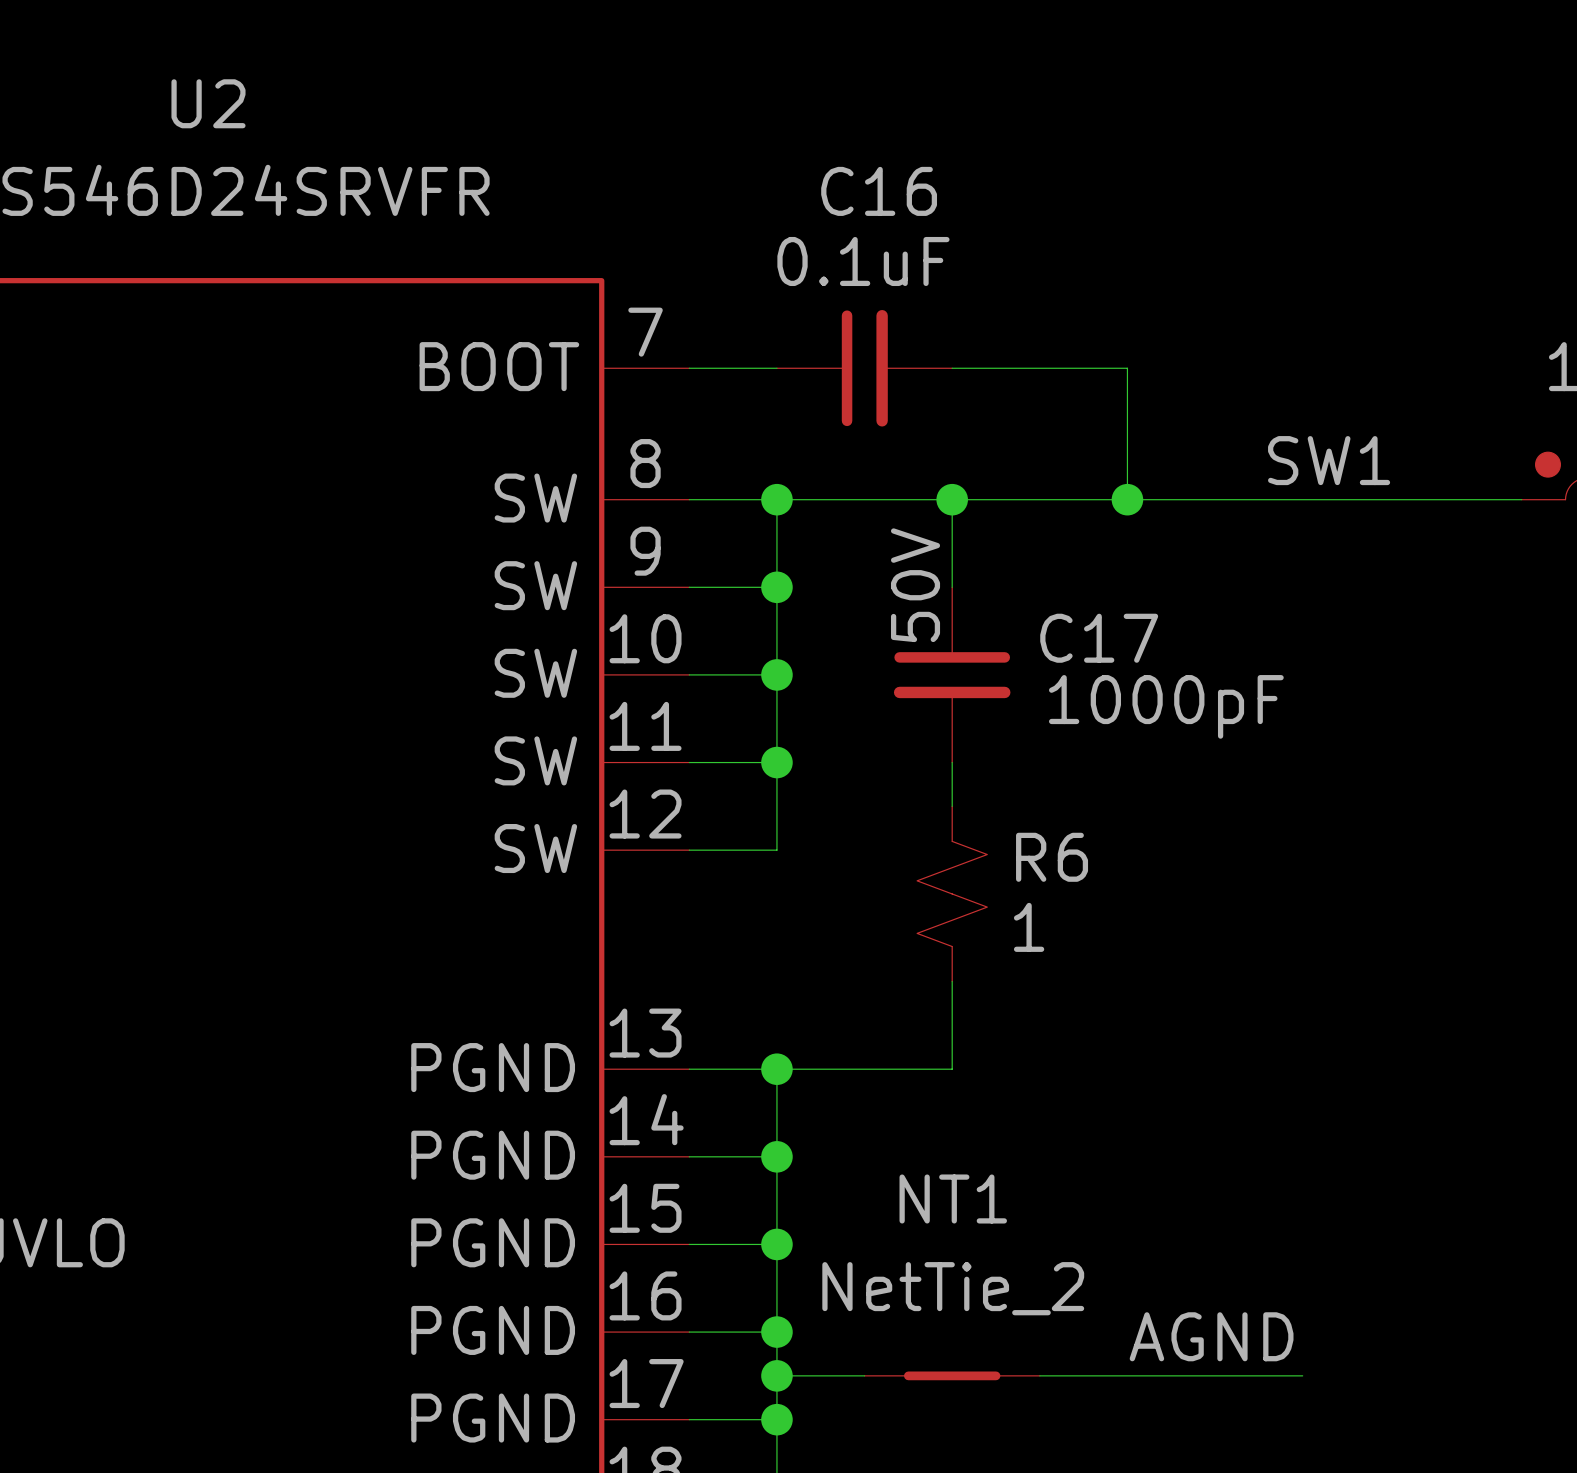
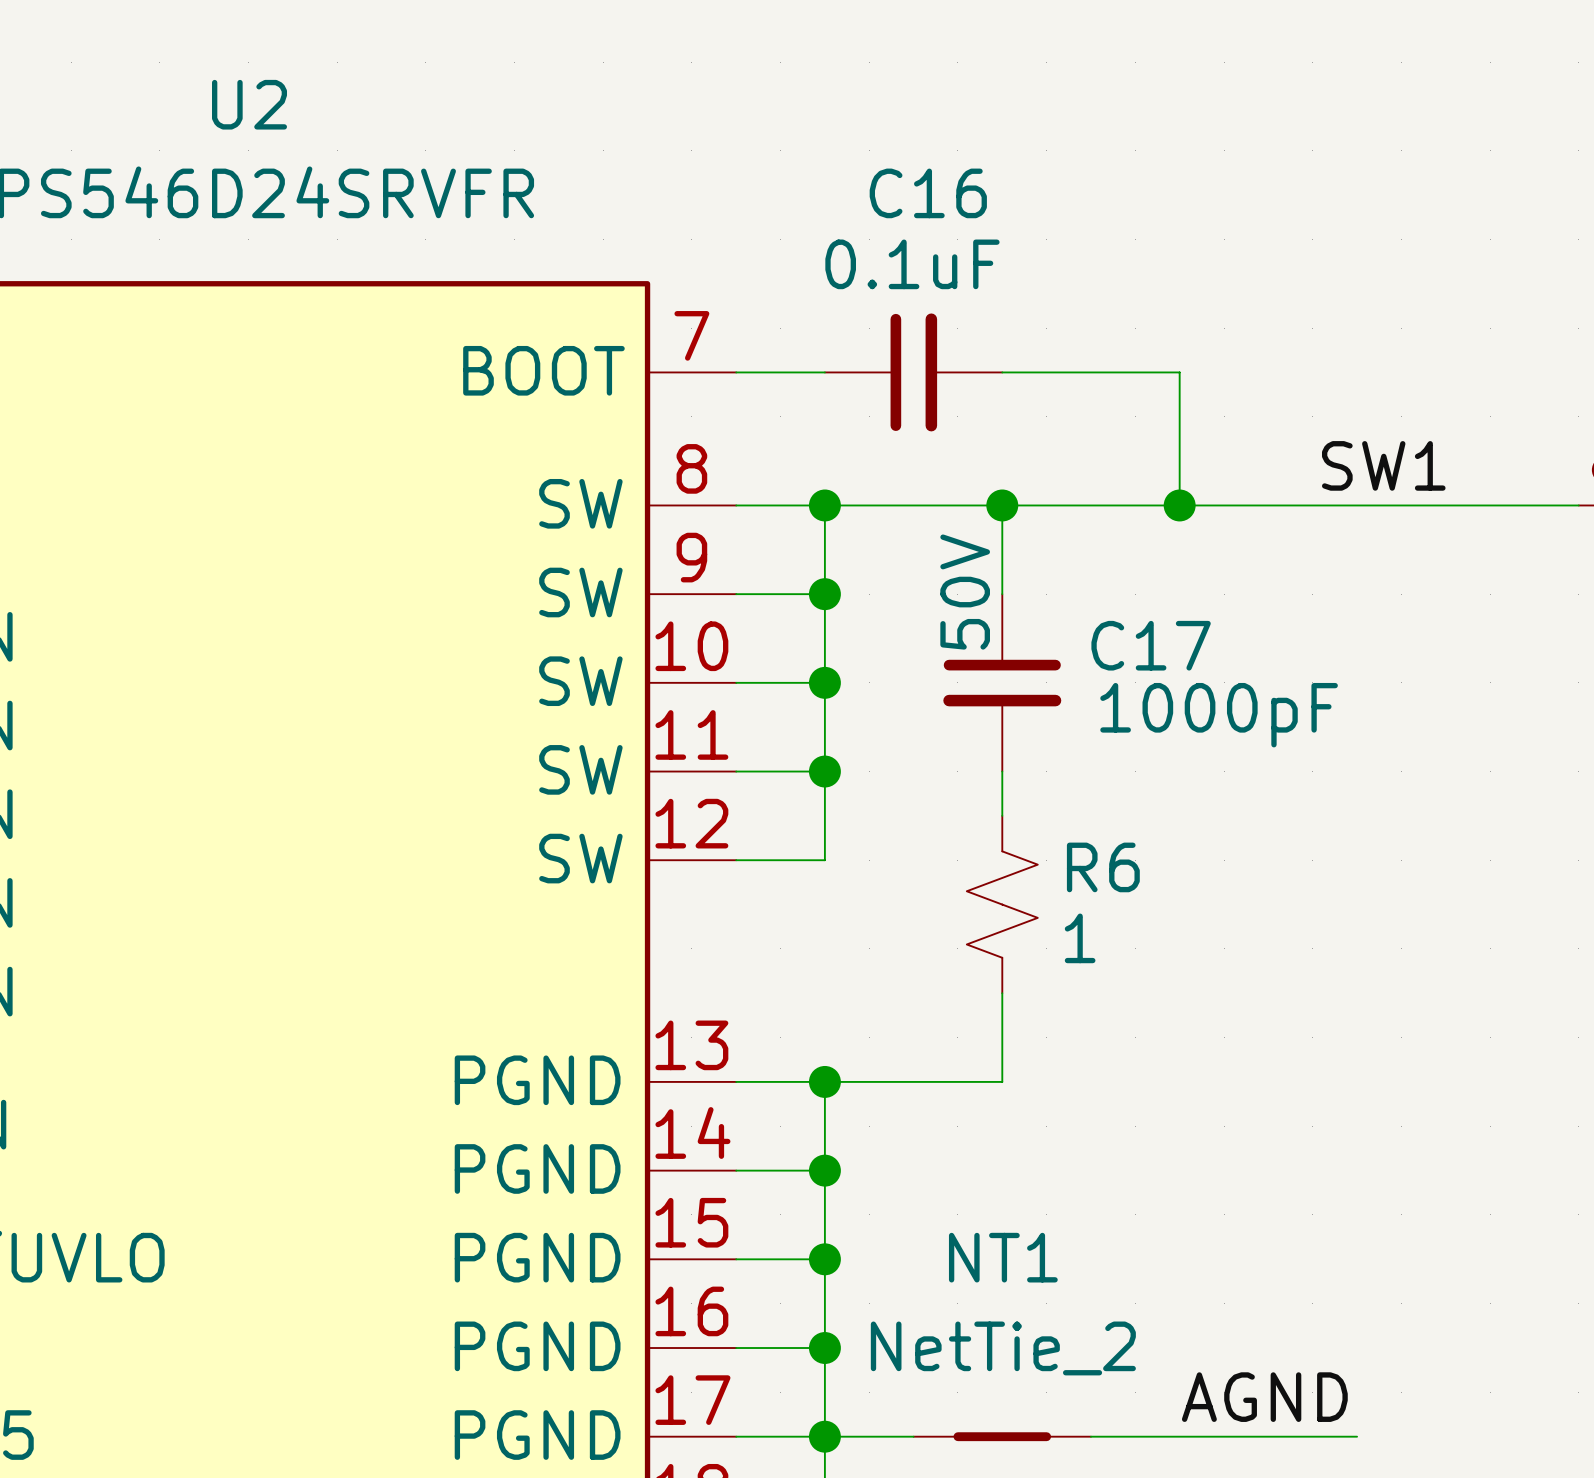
label position: AGND (1211, 1336) -> AGND (1264, 1397)
wire: (776, 1375) (864, 1375) -> (824, 1436) (913, 1436)
junction: (776, 1375) -> none
NT1 position: (952, 1375) -> (1002, 1436)
wire: (1039, 1375) (1302, 1375) -> (1090, 1436) (1357, 1436)

